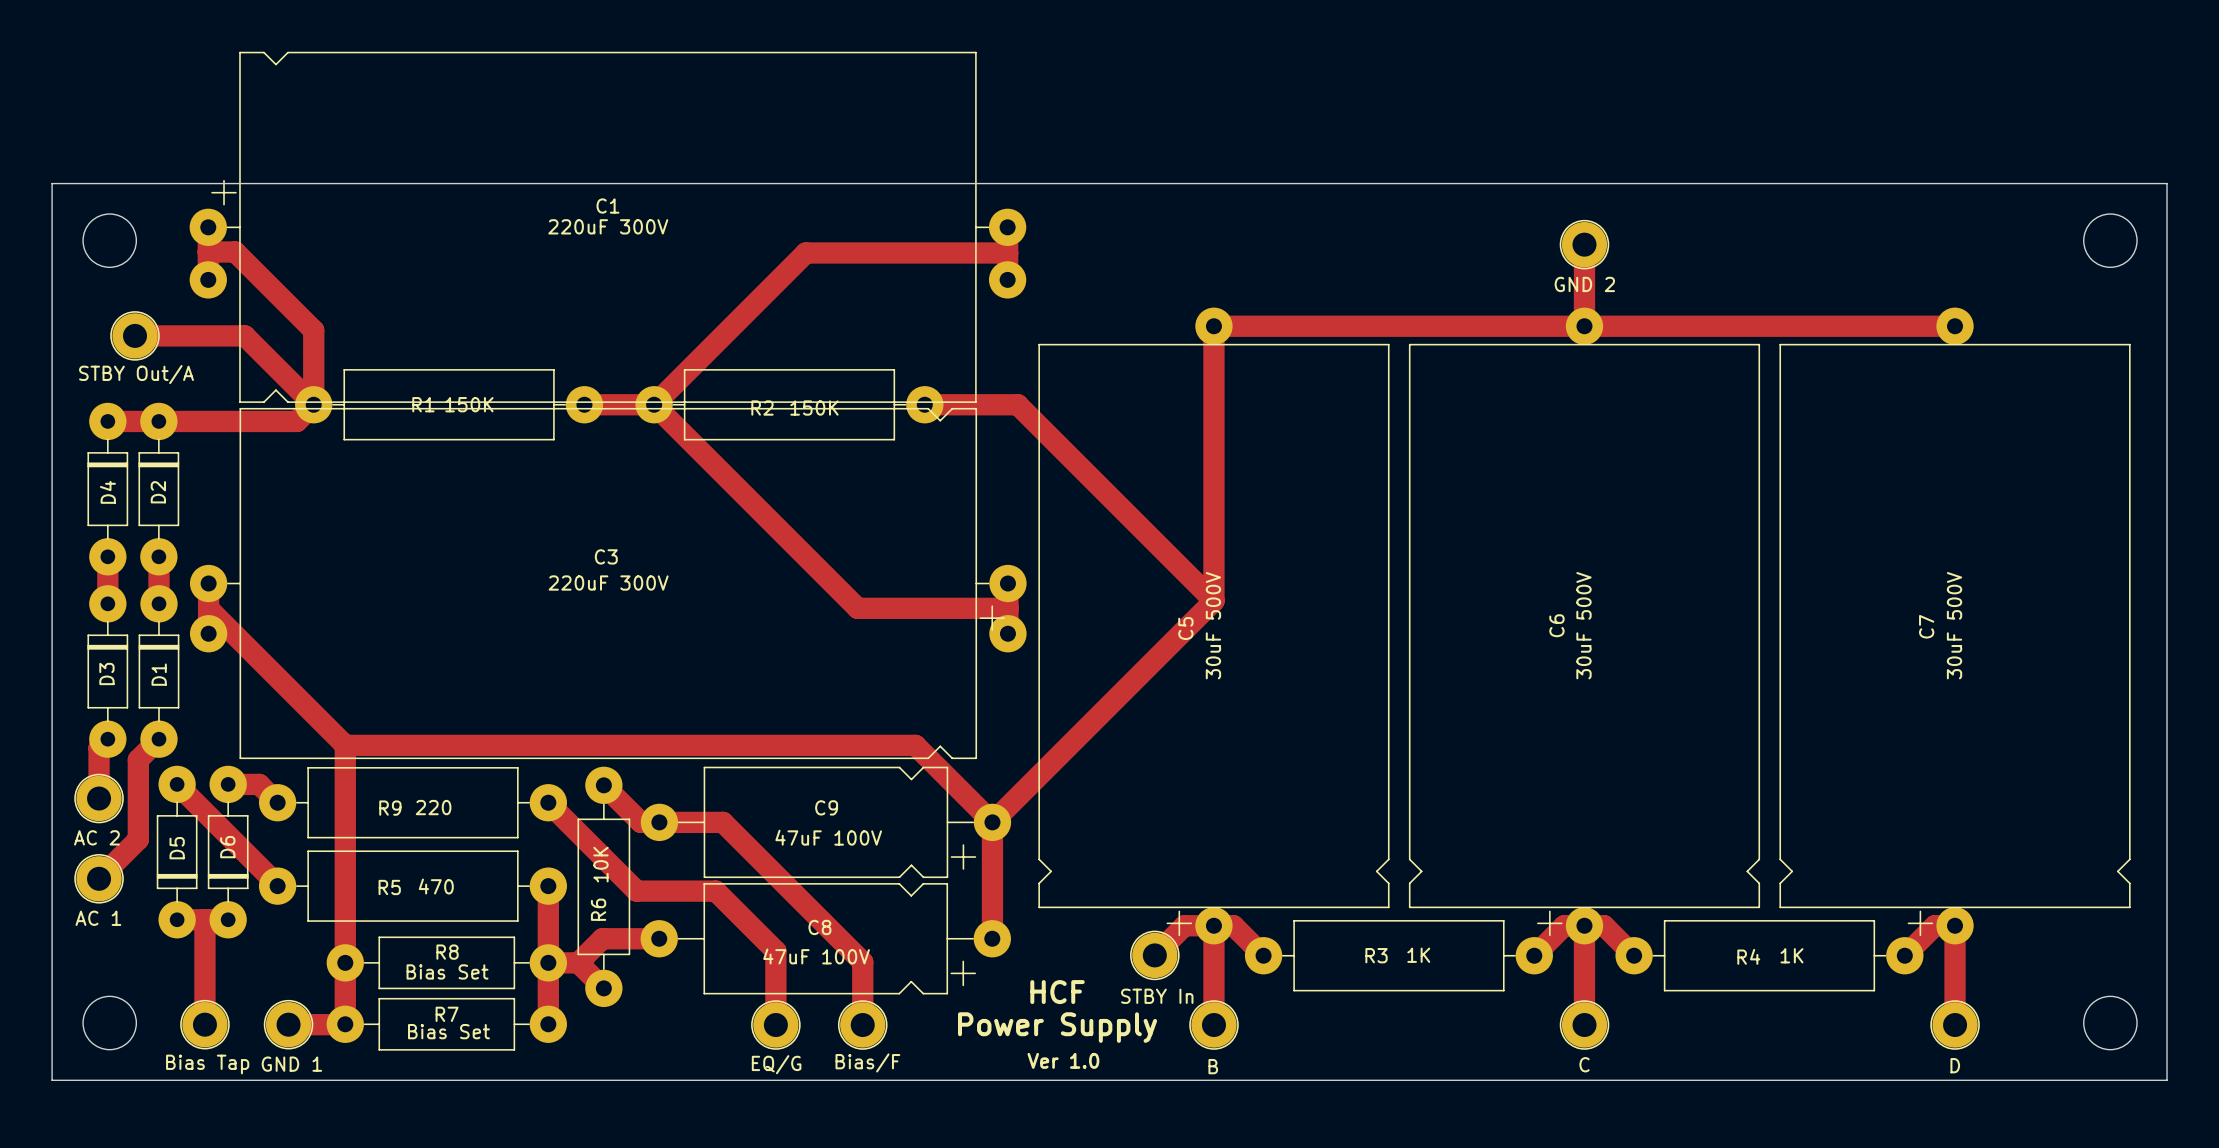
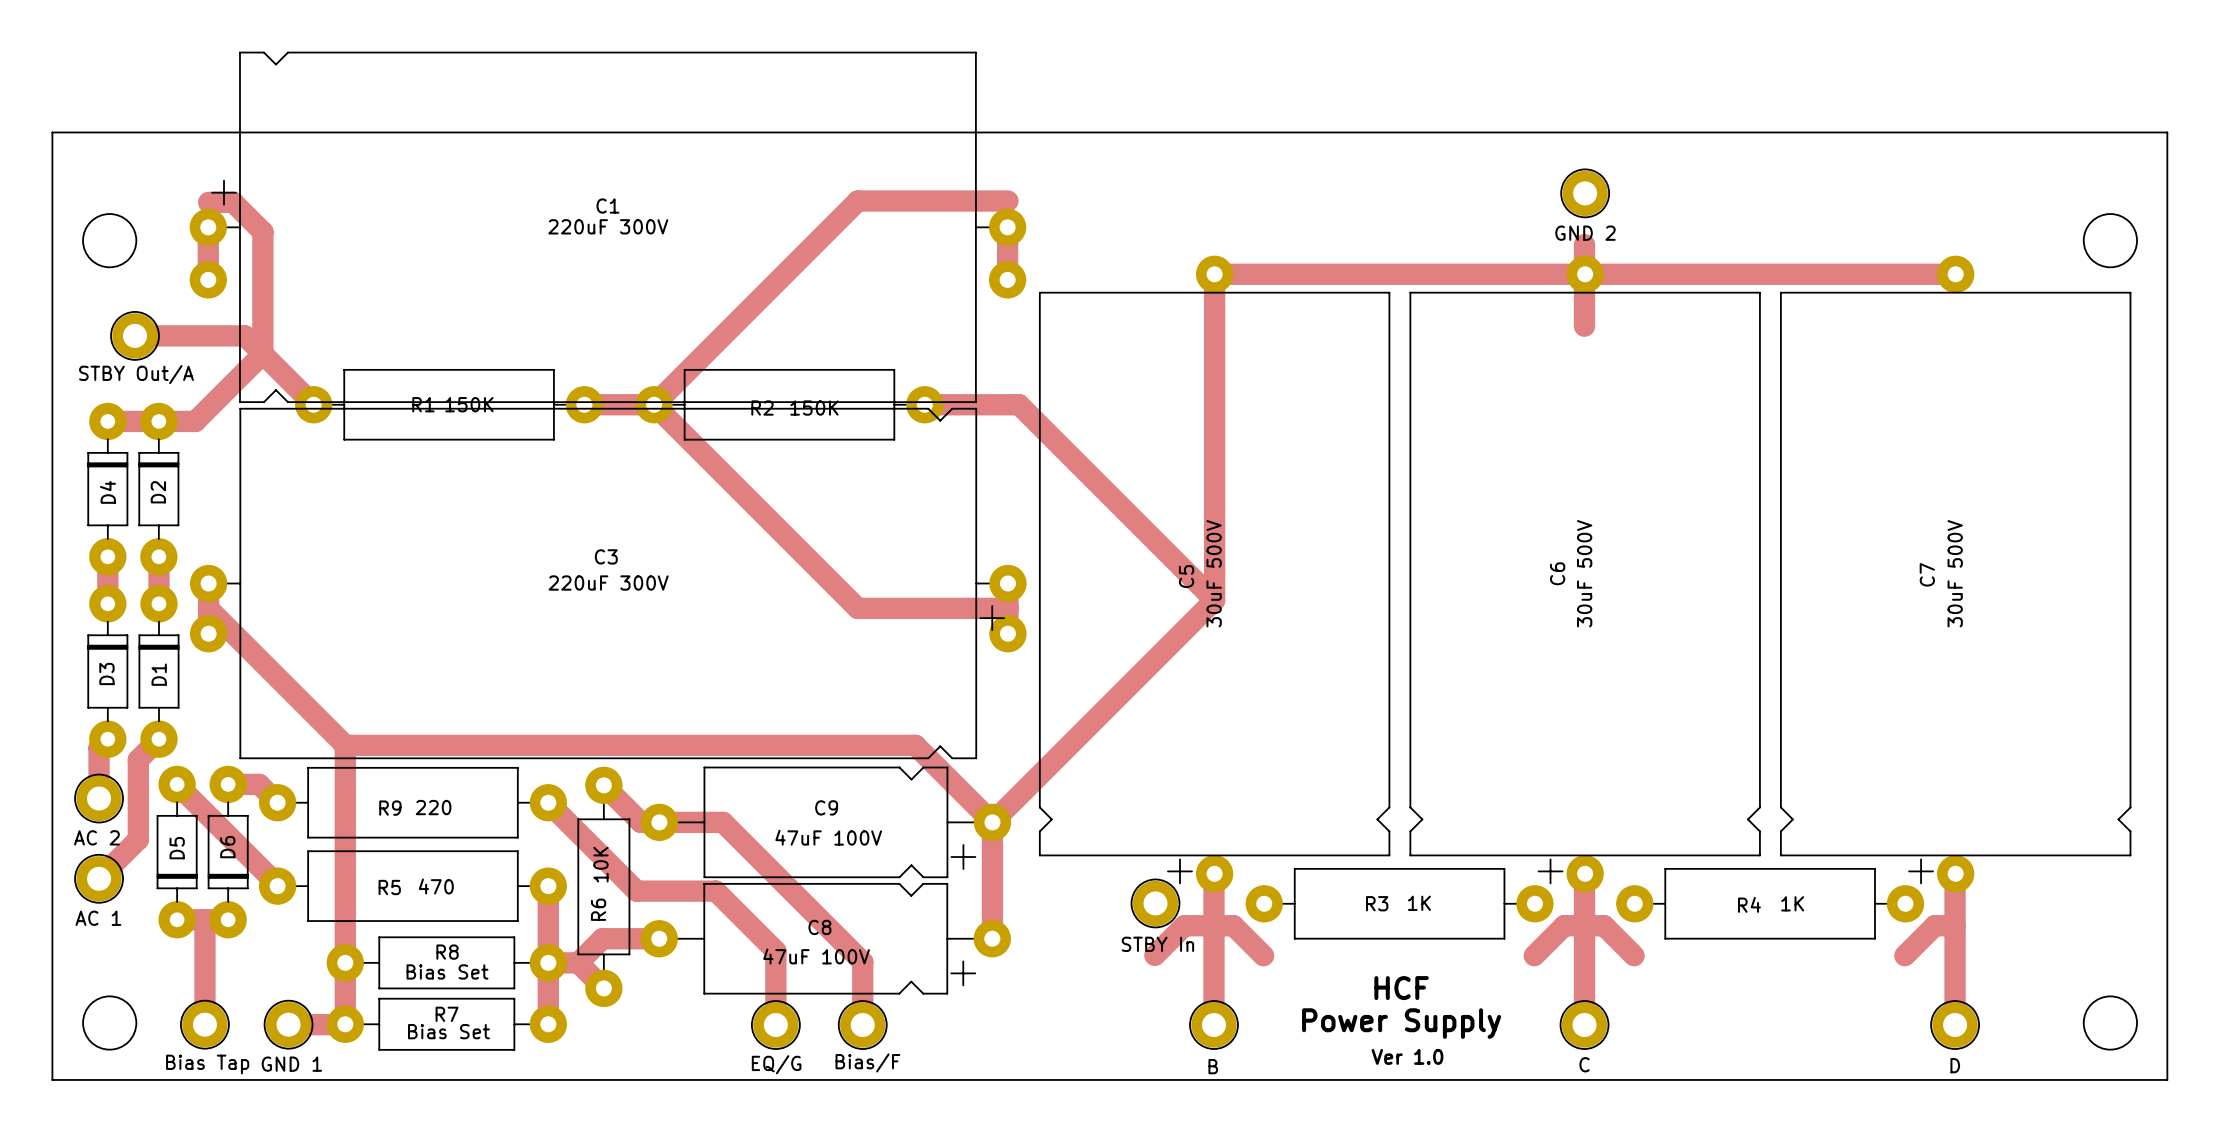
board edge: (52, 183) (2167, 183) (2167, 1080) (52, 1080) (52, 183) -> (52, 132) (52, 1079) (2167, 1079) (2167, 132) (52, 132)
part position: (1584, 244) -> (1585, 193)
track: (208, 251) (235, 251) (313, 330) (313, 404) (297, 421) (195, 421) -> (208, 202) (233, 202) (262, 232) (262, 353) (195, 421)
track: (805, 252) (1007, 252) -> (805, 252) (857, 201) (1007, 201)
track: (1955, 326) (1213, 326) (1213, 600) (1017, 404) -> (1955, 274) (1214, 274) (1214, 600) (1017, 404)
C5 position: (1213, 626) -> (1214, 574)
C6 position: (1584, 626) -> (1585, 574)
C7 position: (1955, 626) -> (1955, 574)
part position: (1154, 955) -> (1155, 903)
R3 position: (1398, 955) -> (1399, 903)
R4 position: (1769, 955) -> (1770, 903)
text: none -> HCF (1401, 988)
text: HCF (1057, 992) -> none
text: none -> Power Supply (1401, 1023)
text: Power Supply (1057, 1027) -> none
text: none -> Ver 1.0 (1407, 1056)
text: Ver 1.0 (1063, 1060) -> none

